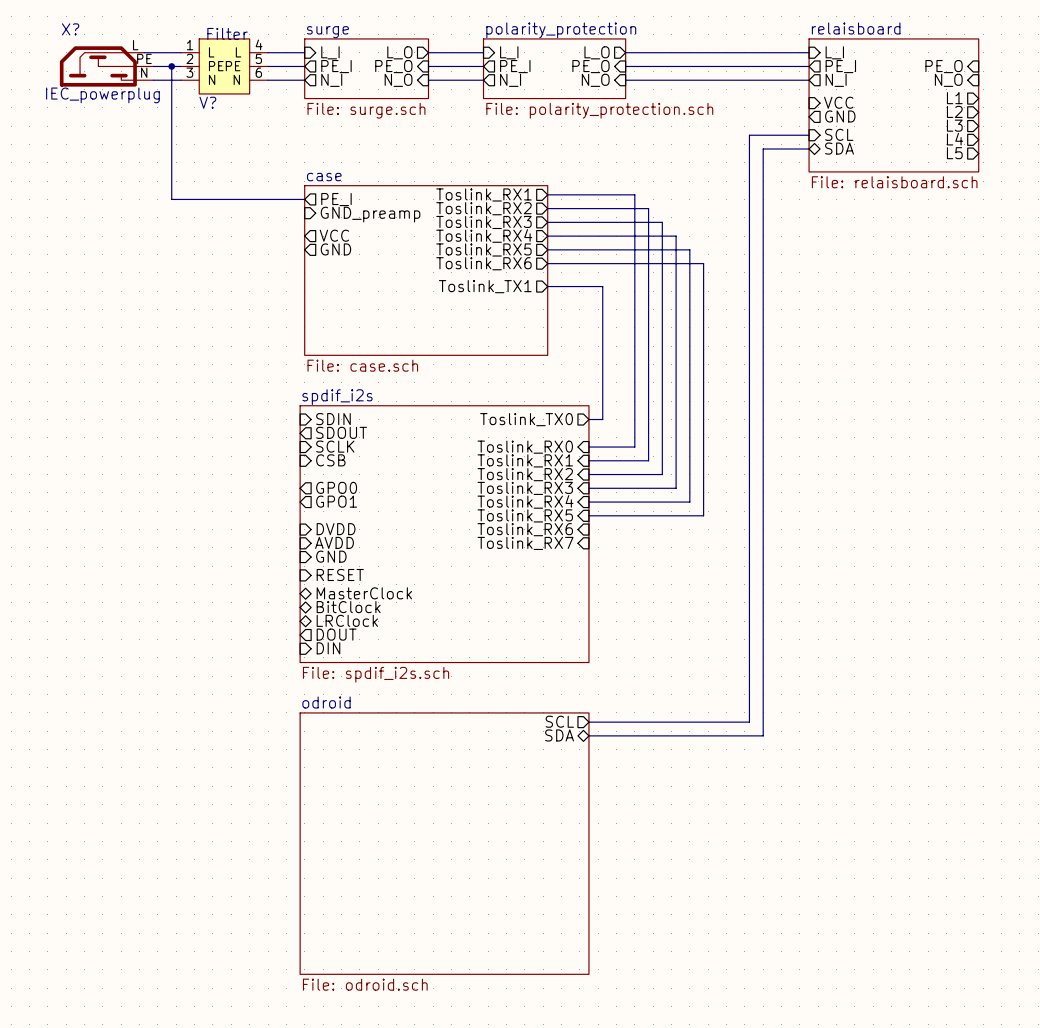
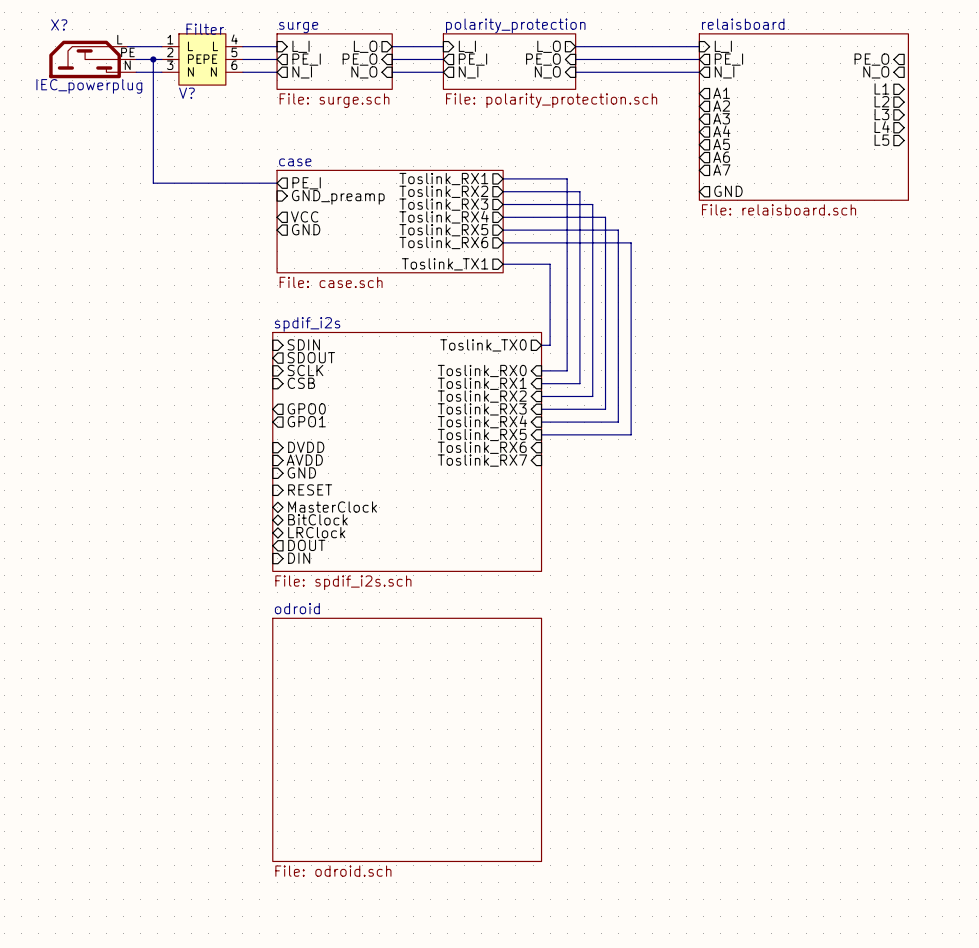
wire: (758, 52) (809, 52) -> none
sheet pin position: L_I (834, 52) -> L_I (723, 46)
wire: (758, 66) (809, 66) -> none
sheet pin position: PE_I (840, 66) -> PE_I (728, 59)
wire: (758, 80) (809, 80) -> none
sheet pin position: N_I (836, 80) -> N_I (724, 72)
sheet pin: none -> A1 (721, 93)
sheet pin: VCC (838, 102) -> none
sheet relaisboard: File: relaisboard.sch (893, 105) -> none
sheet pin: none -> A2 (721, 106)
sheet pin position: GND (840, 116) -> GND (728, 191)
sheet relaisboard: none -> File: relaisboard.sch (803, 117)
sheet pin: none -> A3 (721, 118)
sheet pin: SCL (839, 134) -> none
wire: (809, 135) (749, 135) (749, 722) (588, 722) -> none
sheet pin: none -> A4 (721, 131)
wire: (809, 148) (763, 148) (763, 735) (588, 735) -> none
sheet pin: SDA (839, 148) -> none
sheet pin: none -> A5 (721, 144)
sheet pin: none -> A6 (721, 157)
sheet pin: none -> A7 (721, 170)
wire: (616, 194) (634, 194) (634, 447) (588, 447) -> (567, 178) (567, 370) (541, 370)
wire: (630, 208) (648, 208) (648, 460) (588, 460) -> (579, 191) (579, 383) (541, 383)
wire: (643, 222) (662, 222) (662, 474) (588, 474) -> (592, 204) (592, 396) (541, 396)
wire: (657, 236) (676, 236) (676, 488) (588, 488) -> (605, 217) (605, 409) (541, 409)
sheet case: none -> File: case.sch (390, 221)
wire: (671, 249) (689, 249) (689, 502) (588, 502) -> (618, 230) (618, 422) (541, 422)
wire: (685, 263) (703, 263) (703, 515) (588, 515) -> (631, 242) (631, 434) (541, 434)
sheet case: File: case.sch (426, 270) -> none
wire: (598, 286) (602, 286) (602, 419) (588, 419) -> (550, 264) (550, 345) (541, 345)
sheet pin position: SDIN (333, 419) -> SDIN (303, 344)
sheet pin position: Toslink_TX0 (526, 419) -> Toslink_TX0 (483, 345)
sheet pin position: SDOUT (341, 432) -> SDOUT (311, 357)
sheet pin position: SCLK (335, 446) -> SCLK (305, 370)
sheet pin position: Toslink_RX0 (525, 447) -> Toslink_RX0 (482, 370)
sheet pin position: CSB (330, 460) -> CSB (301, 383)
sheet pin position: Toslink_RX1 (525, 460) -> Toslink_RX1 (482, 383)
sheet pin position: Toslink_RX2 (525, 474) -> Toslink_RX2 (482, 396)
sheet pin: none -> DVDD (306, 447)
sheet pin position: GPO0 (336, 487) -> GPO0 (306, 408)
sheet pin position: Toslink_RX3 (525, 488) -> Toslink_RX3 (482, 409)
sheet pin position: GPO1 (336, 501) -> GPO1 (306, 421)
sheet pin position: Toslink_RX4 (525, 501) -> Toslink_RX4 (482, 421)
sheet pin position: Toslink_RX5 (525, 515) -> Toslink_RX5 (482, 434)
sheet pin: DVDD (336, 529) -> RESET (310, 489)
sheet pin position: Toslink_RX6 (525, 529) -> Toslink_RX6 (482, 447)
sheet spdif_i2s position: (444, 534) -> (407, 451)
sheet pin position: AVDD (334, 542) -> AVDD (304, 460)
sheet pin position: Toslink_RX7 (525, 543) -> Toslink_RX7 (482, 460)
sheet pin position: GND (331, 556) -> GND (301, 472)
sheet pin shape: input (340, 575) -> bidirectional (316, 532)
sheet pin: RESET (340, 575) -> LRClock (316, 532)
sheet pin position: MasterClock (364, 593) -> MasterClock (332, 507)
sheet pin position: BitClock (348, 607) -> BitClock (317, 519)
sheet pin: LRClock (347, 620) -> none
sheet pin position: DOUT (336, 634) -> DOUT (306, 545)
sheet pin position: DIN (328, 648) -> DIN (299, 558)
sheet pin: SCL (559, 721) -> none
sheet pin: SDA (559, 735) -> none
sheet odroid position: (444, 843) -> (407, 739)

